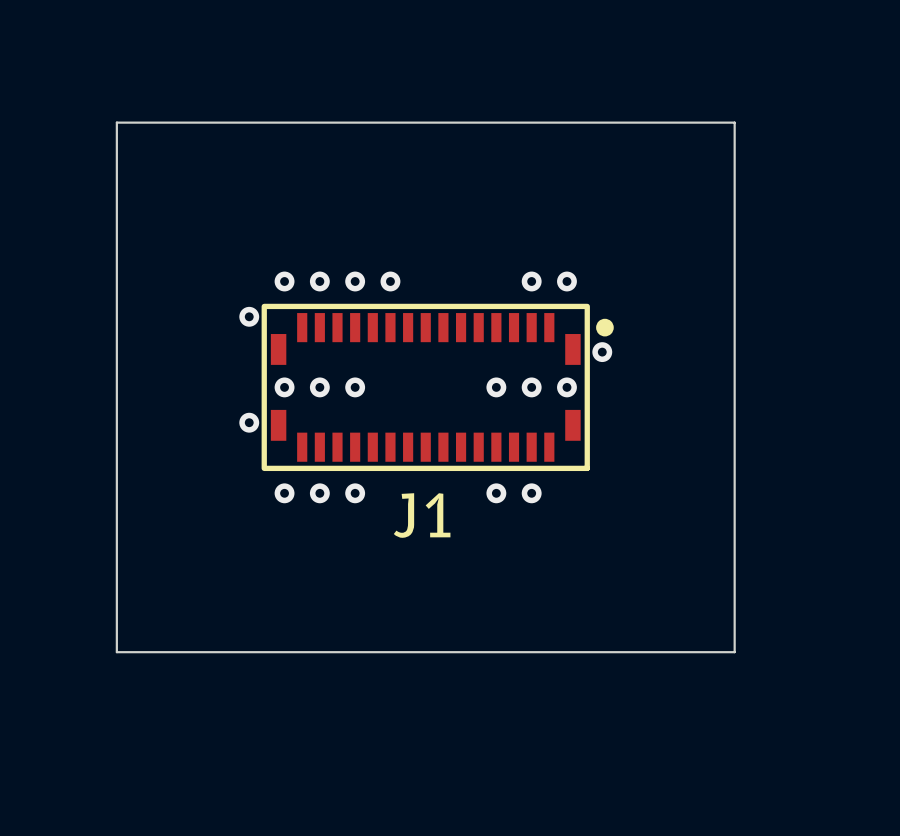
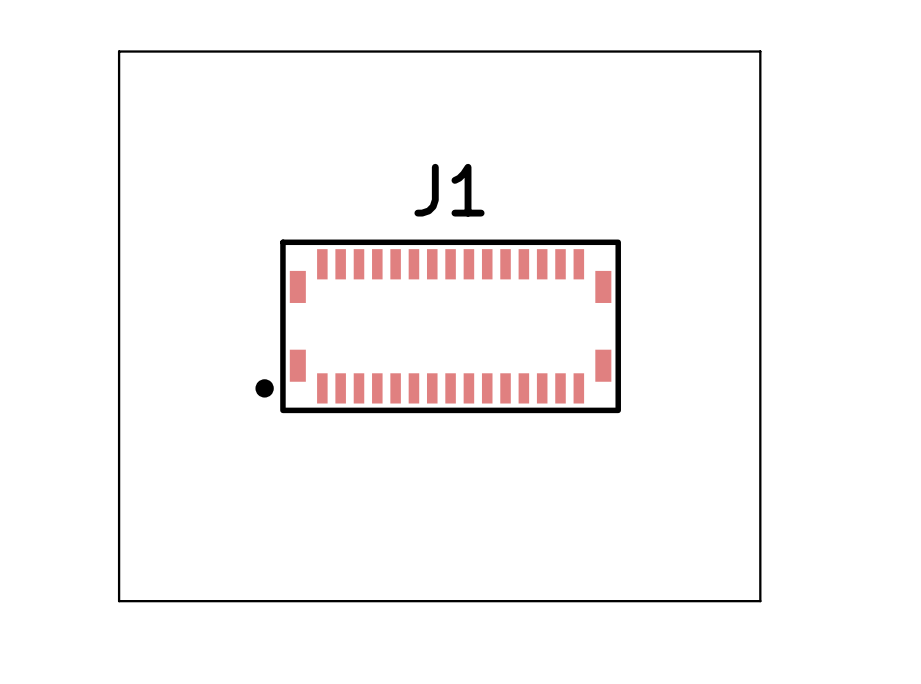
via: (284, 281) -> none
via: (319, 281) -> none
via: (355, 281) -> none
via: (390, 281) -> none
via: (531, 281) -> none
via: (566, 281) -> none
via: (249, 316) -> none
via: (602, 352) -> none
via: (284, 387) -> none
via: (319, 387) -> none
via: (355, 387) -> none
J1 rotation: 0° (437, 387) -> 180° (438, 326)
via: (496, 387) -> none
via: (531, 387) -> none
via: (566, 387) -> none
via: (249, 422) -> none
via: (284, 493) -> none
via: (319, 493) -> none
via: (355, 493) -> none
via: (496, 493) -> none
via: (531, 493) -> none

